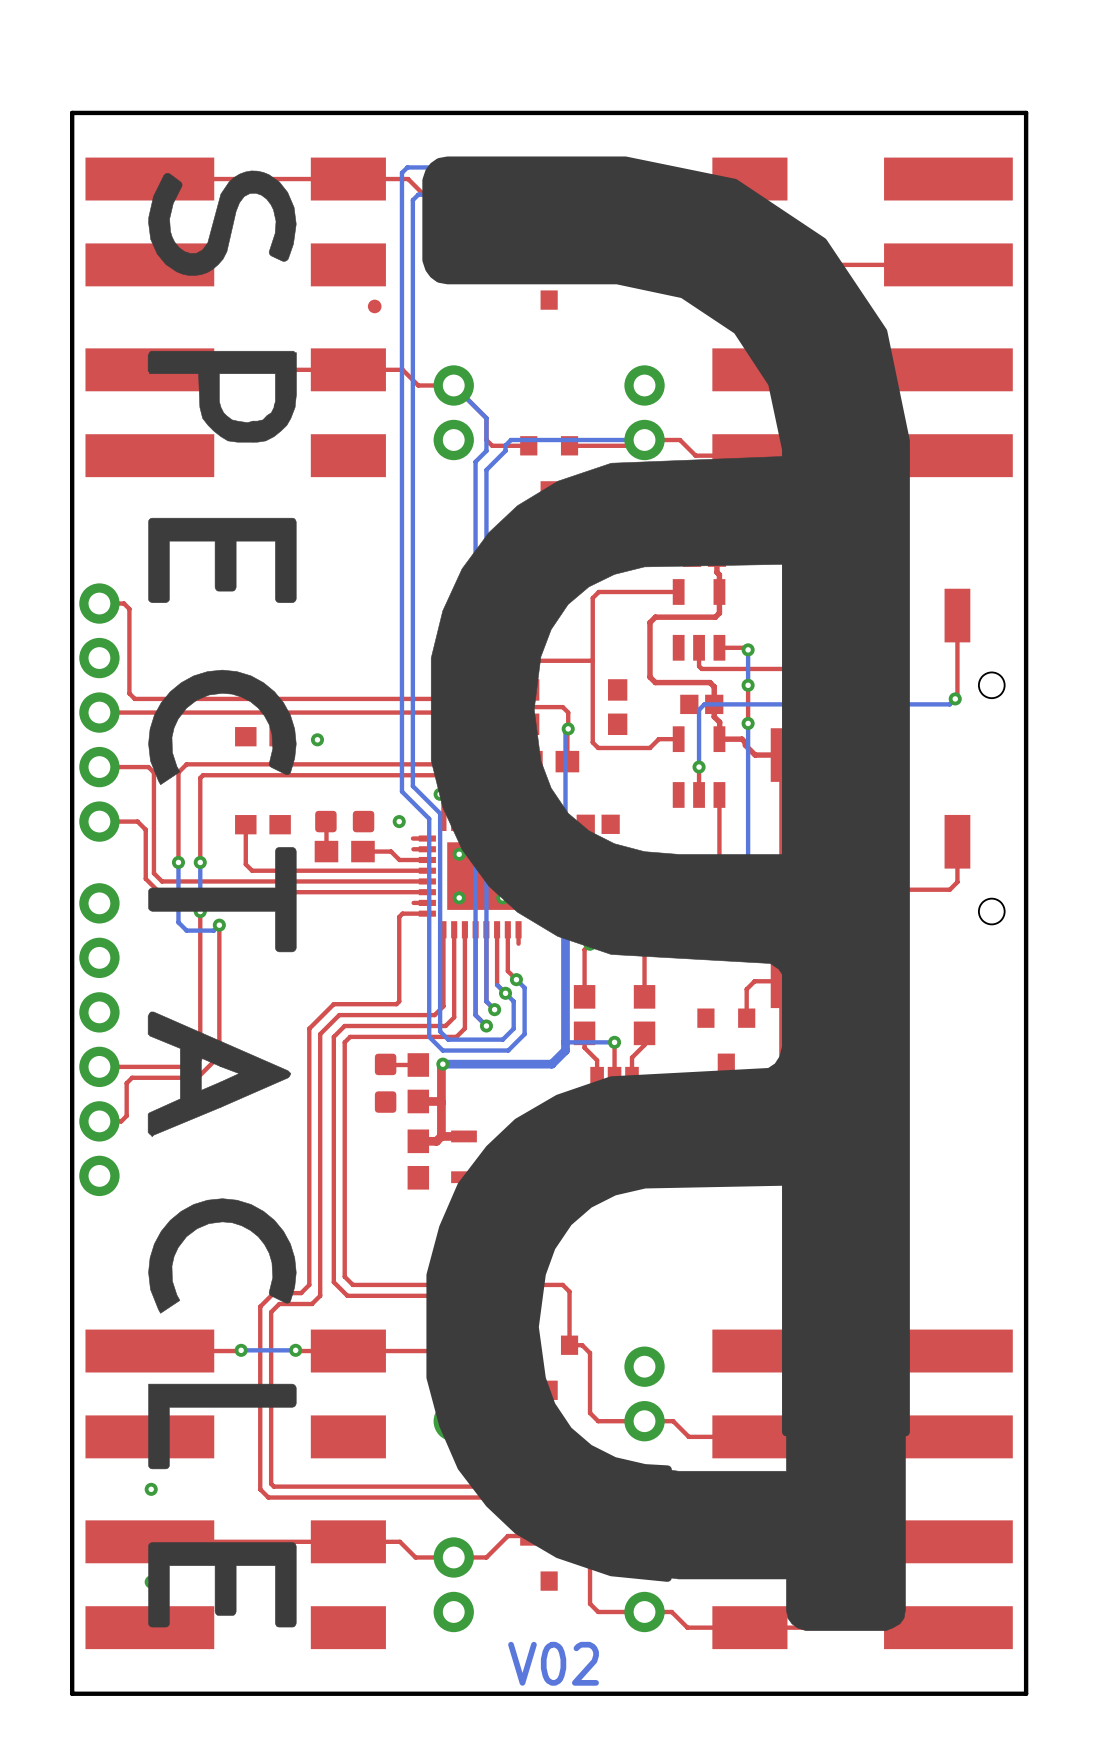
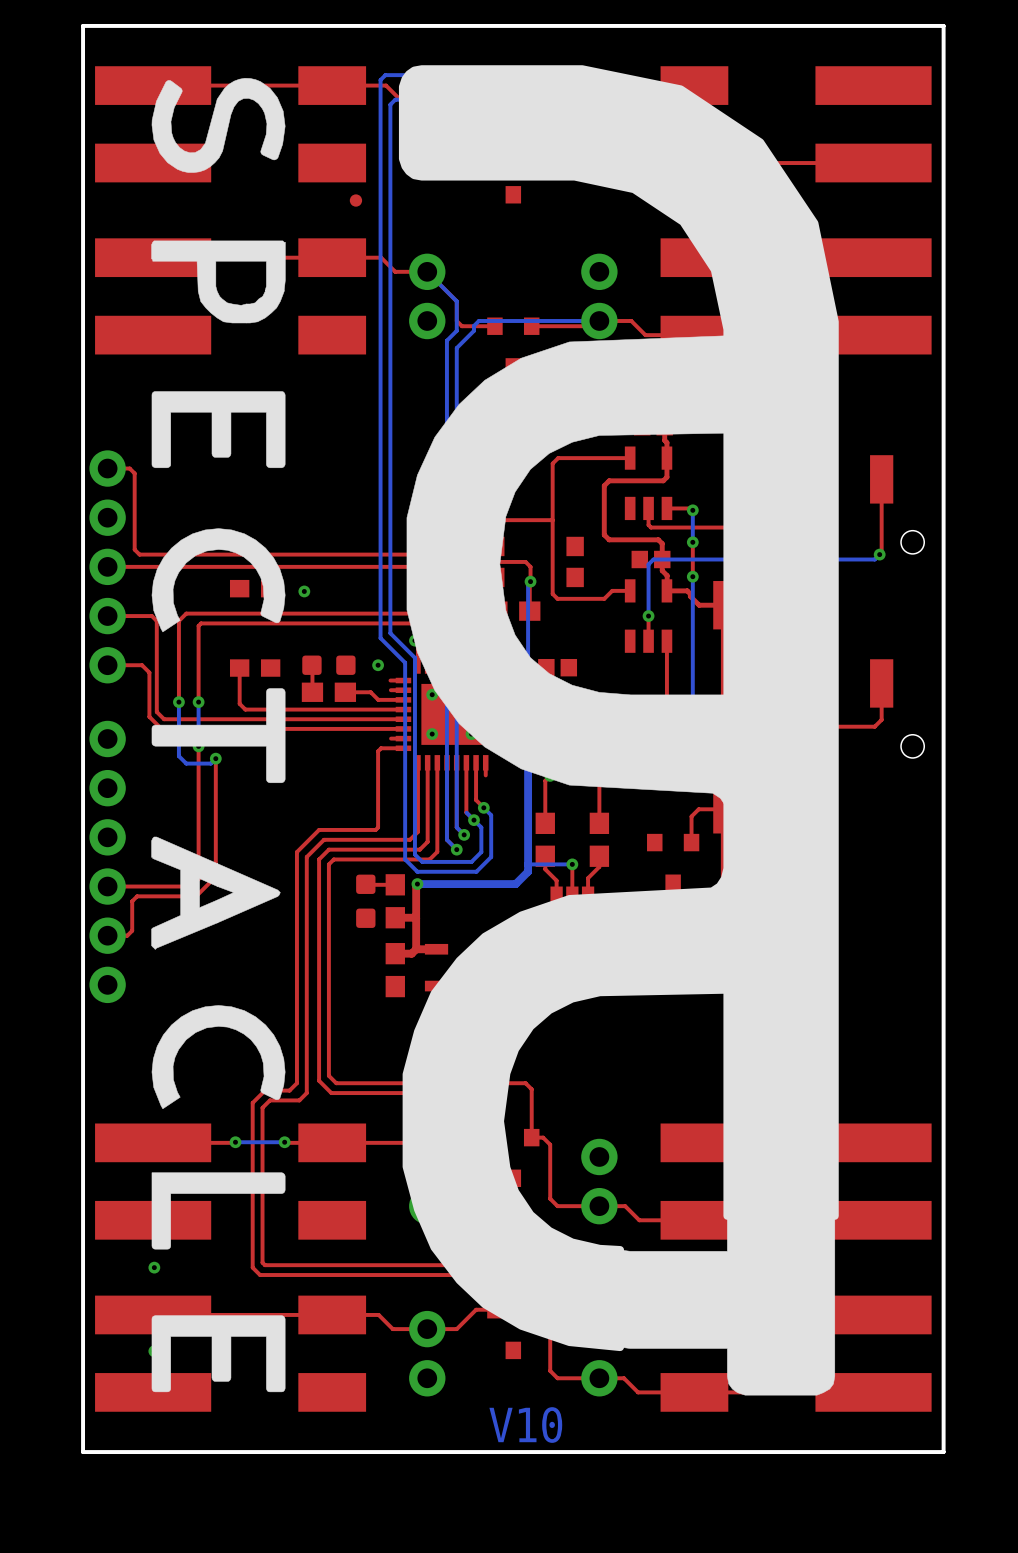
text: V02 (553, 1663) -> V10 (525, 1425)

